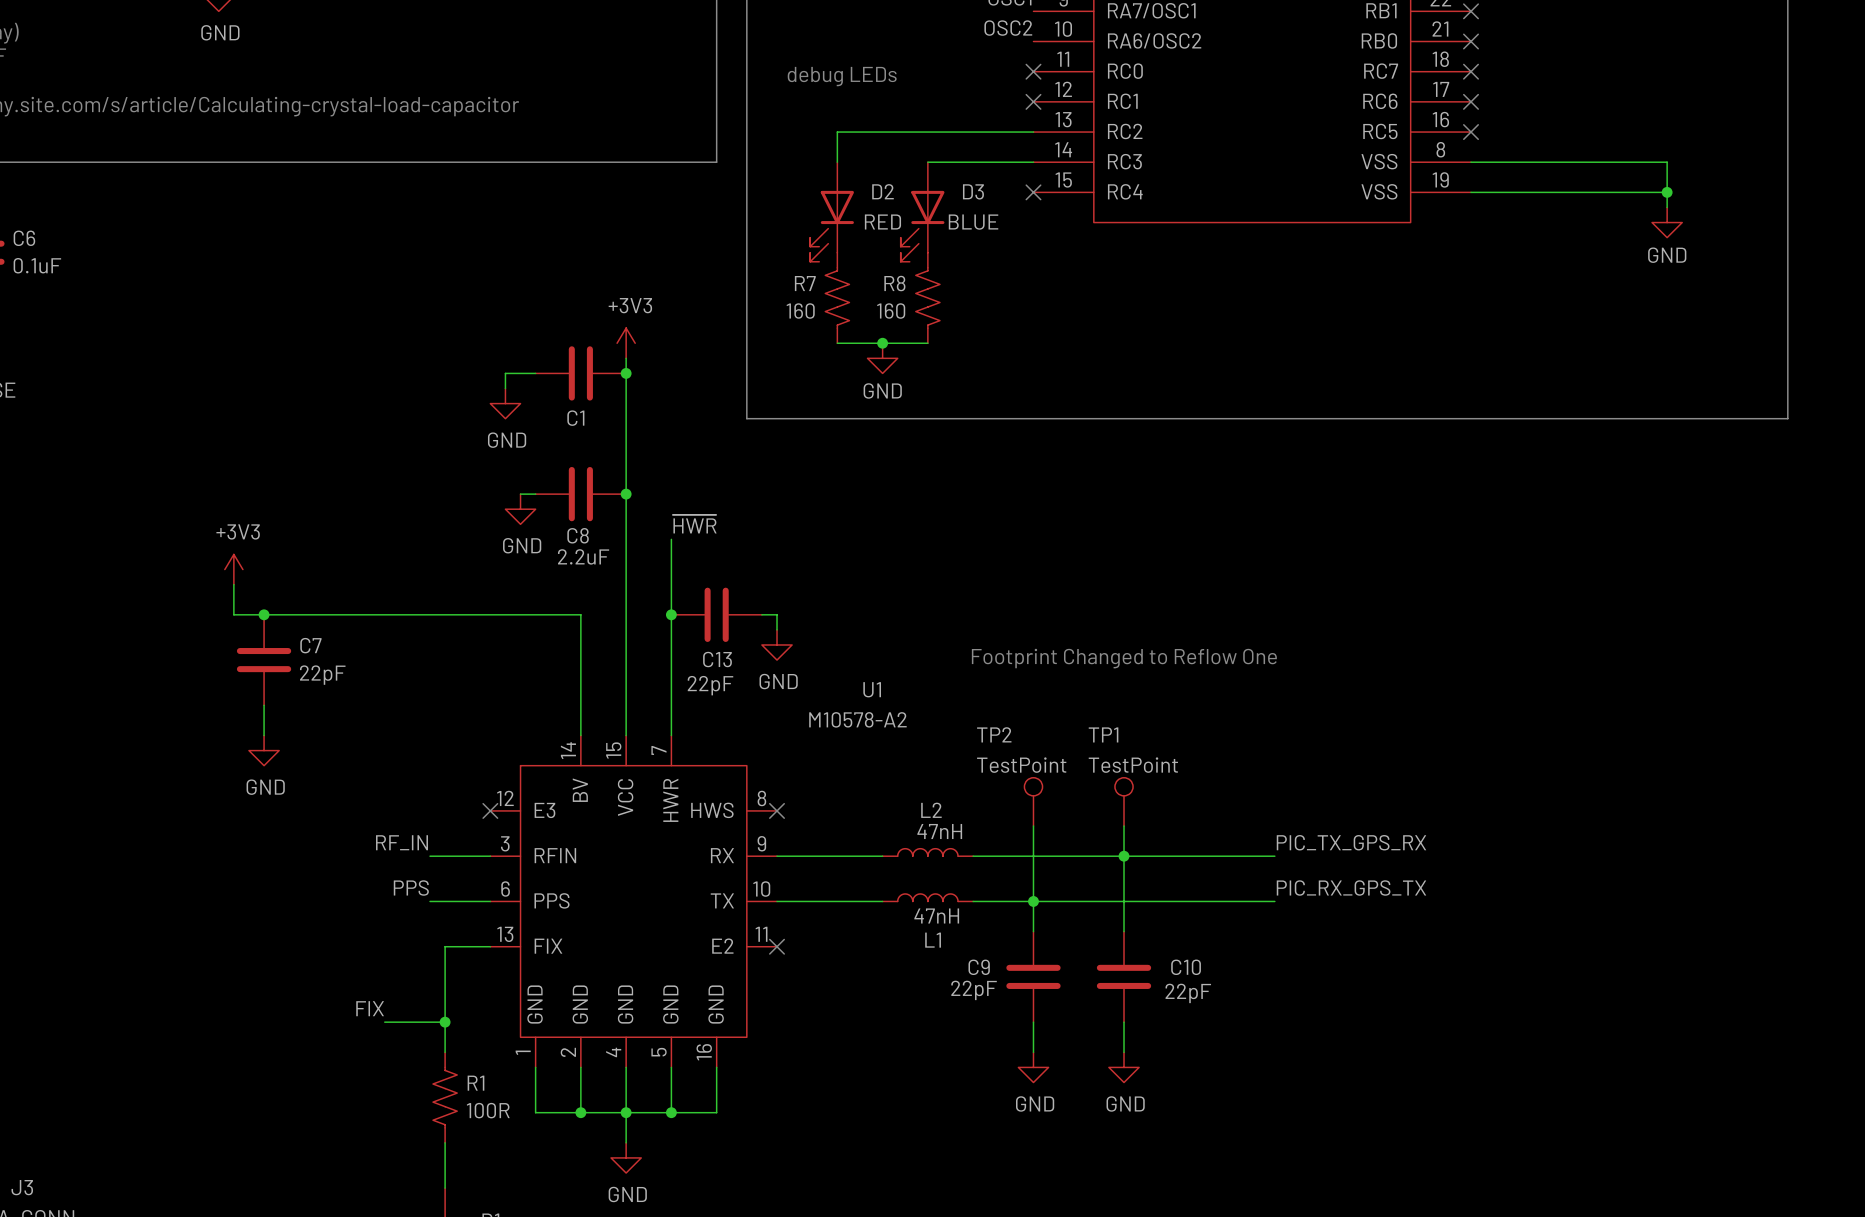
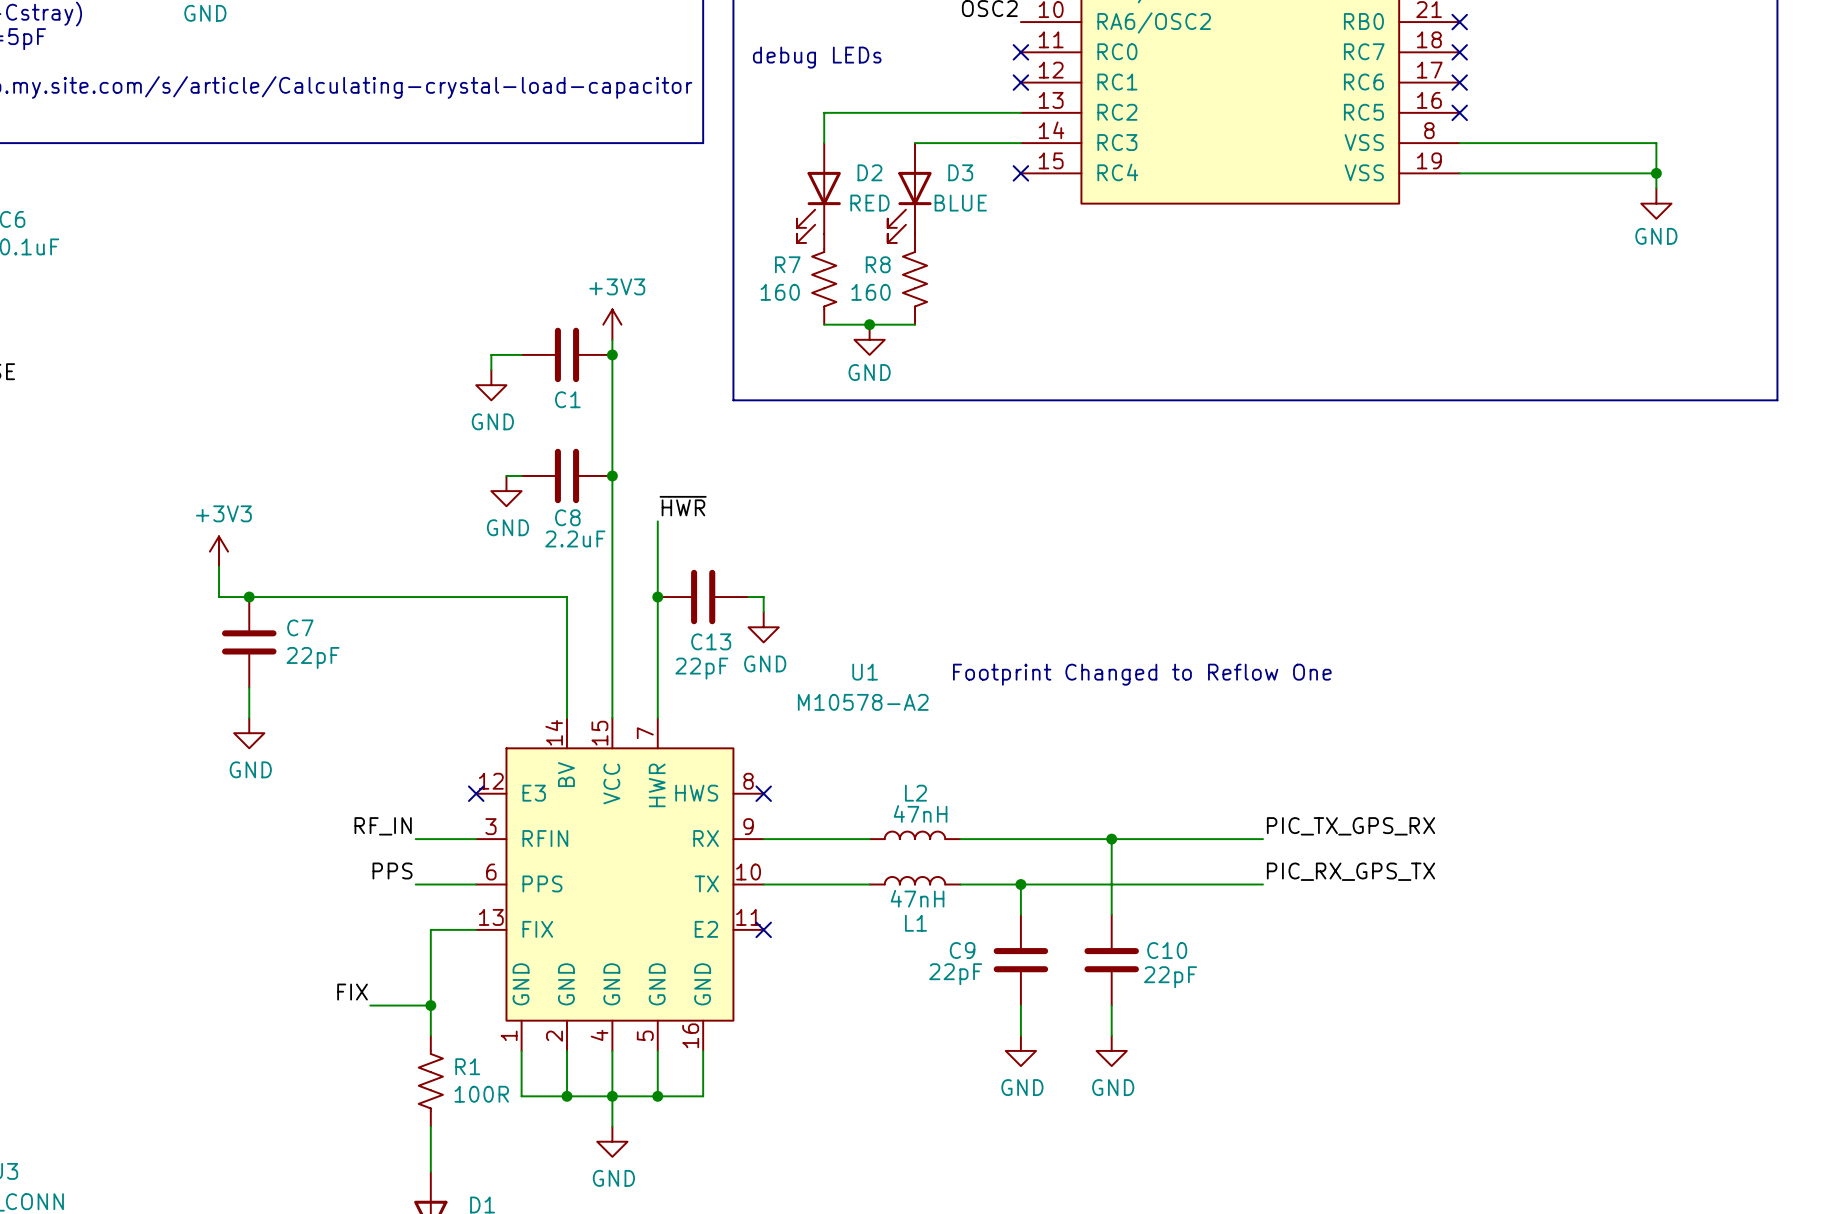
text position: Footprint Changed to Reflow One (1124, 658) -> Footprint Changed to Reflow One (1142, 674)
TP2: TestPoint (1033, 801) -> none
TP1: TestPoint (1124, 801) -> none
wire: (1033, 826) (1033, 901) -> none
wire: (1124, 826) (1124, 856) -> none

